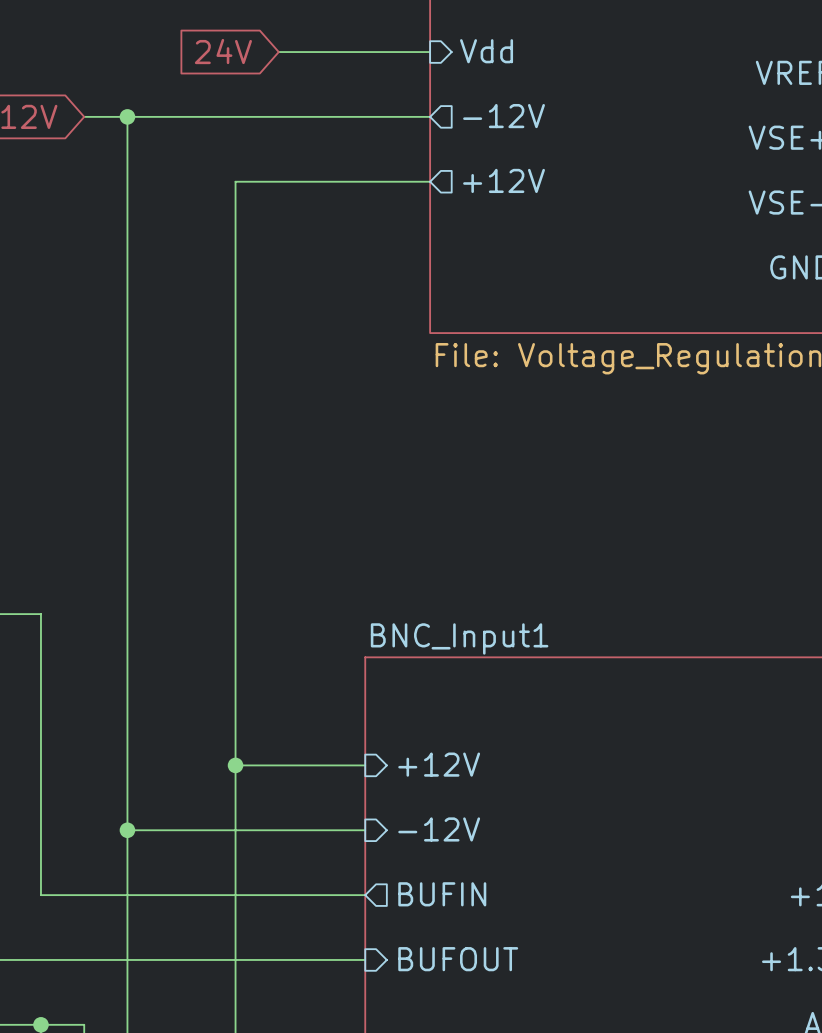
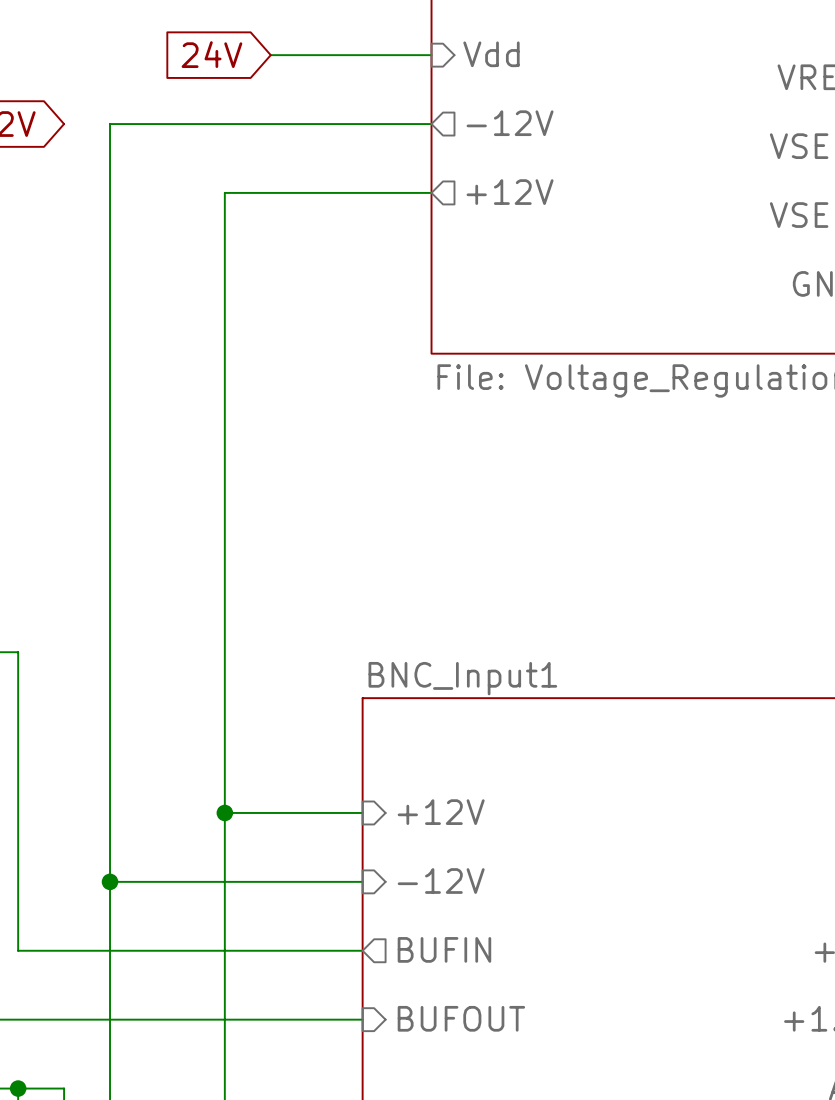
wire: (84, 116) (127, 116) -> none
junction: (127, 116) -> none

